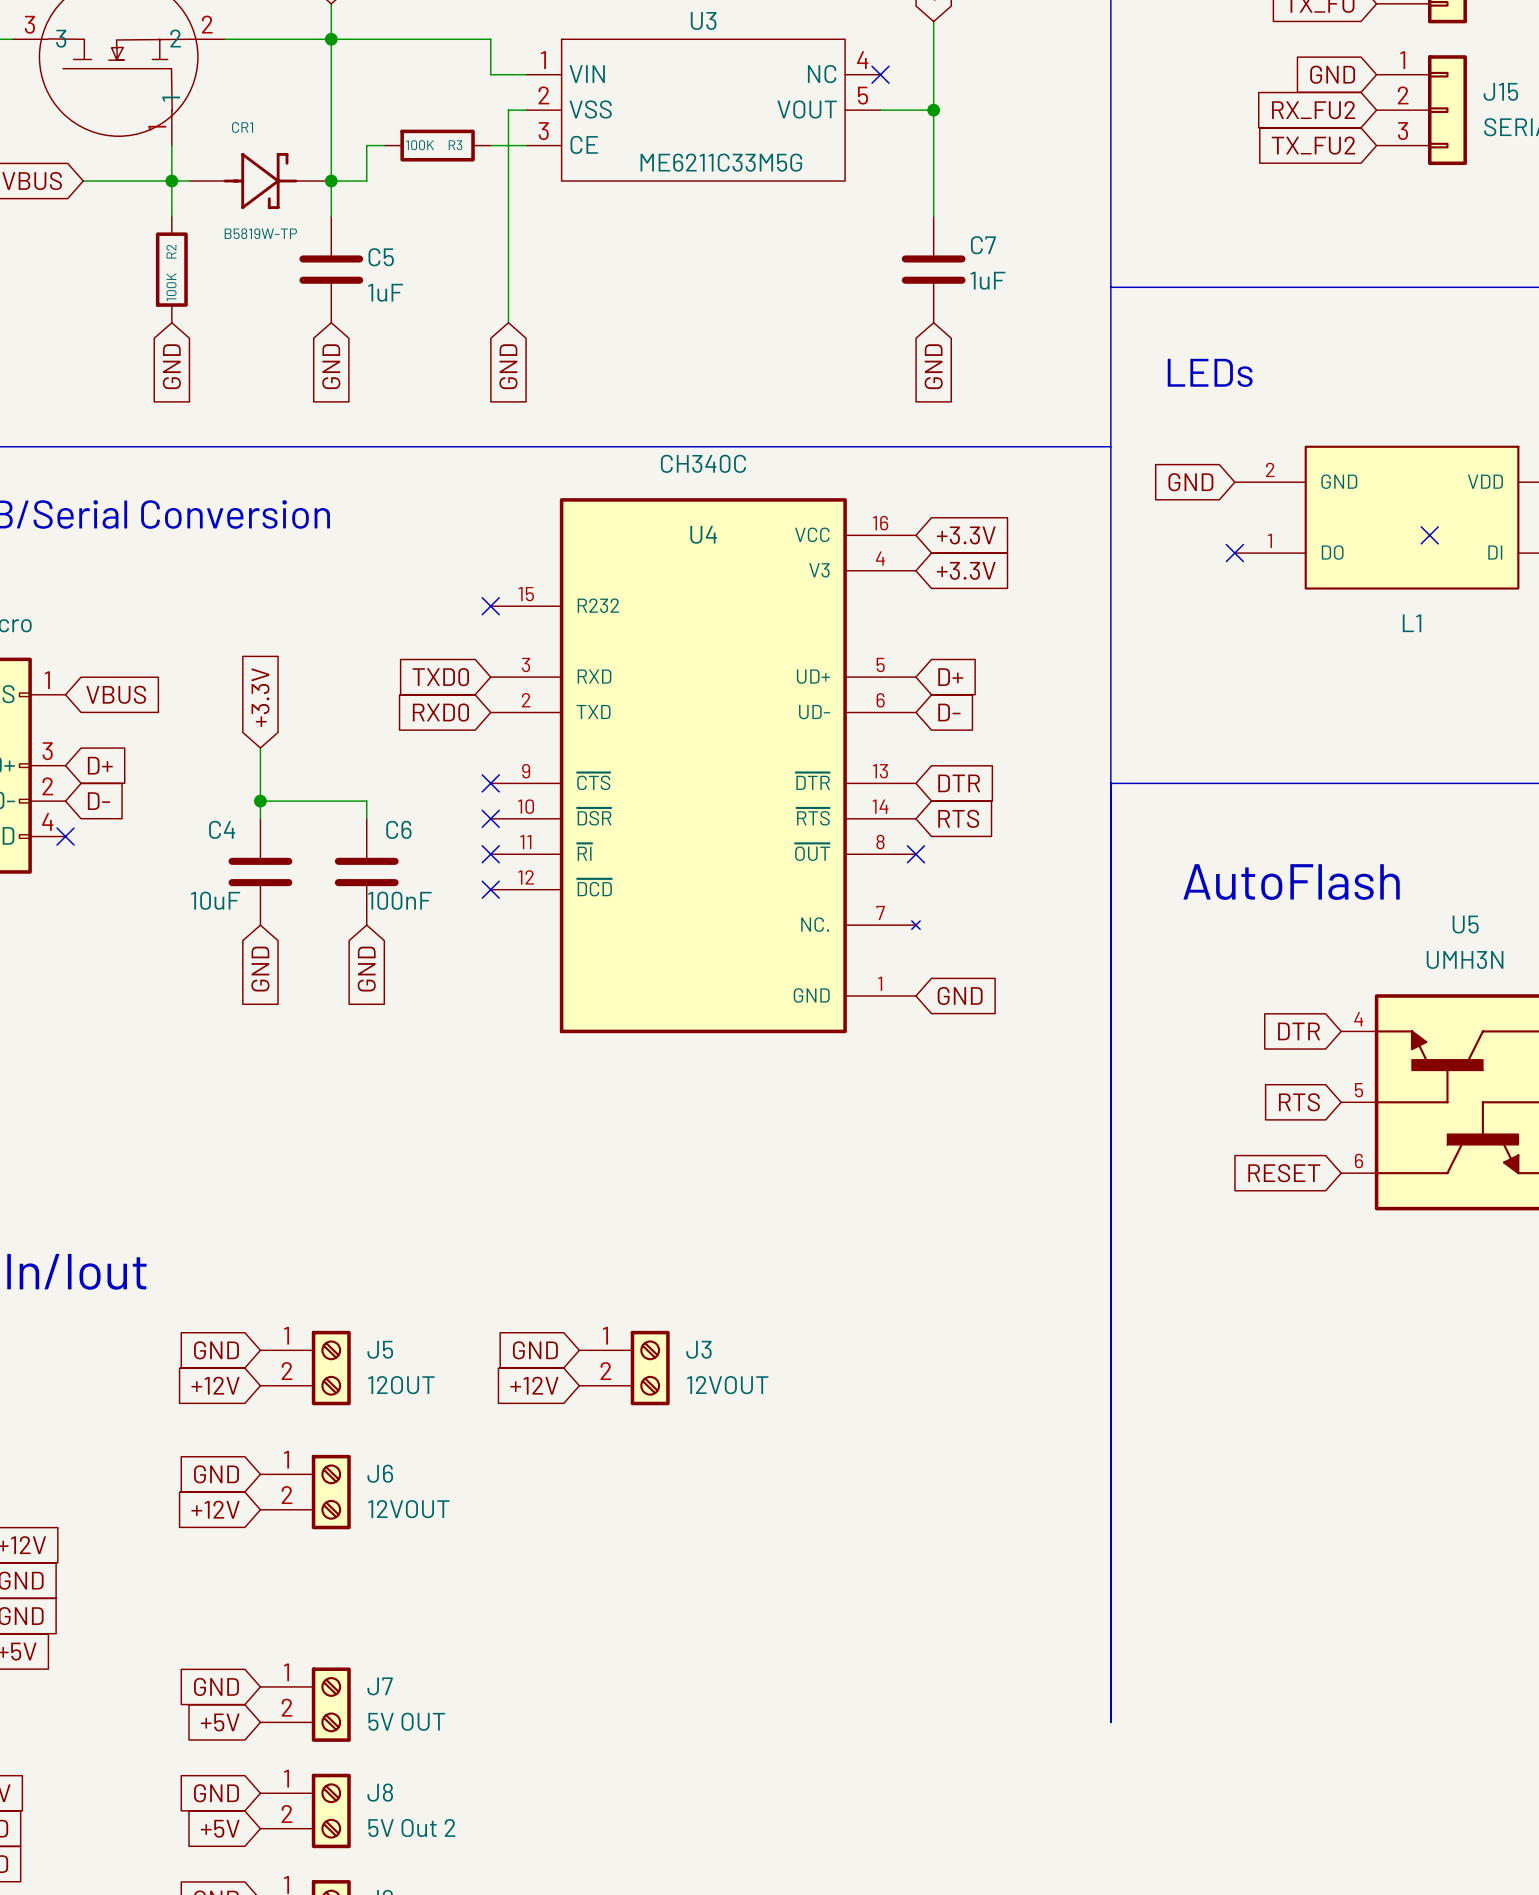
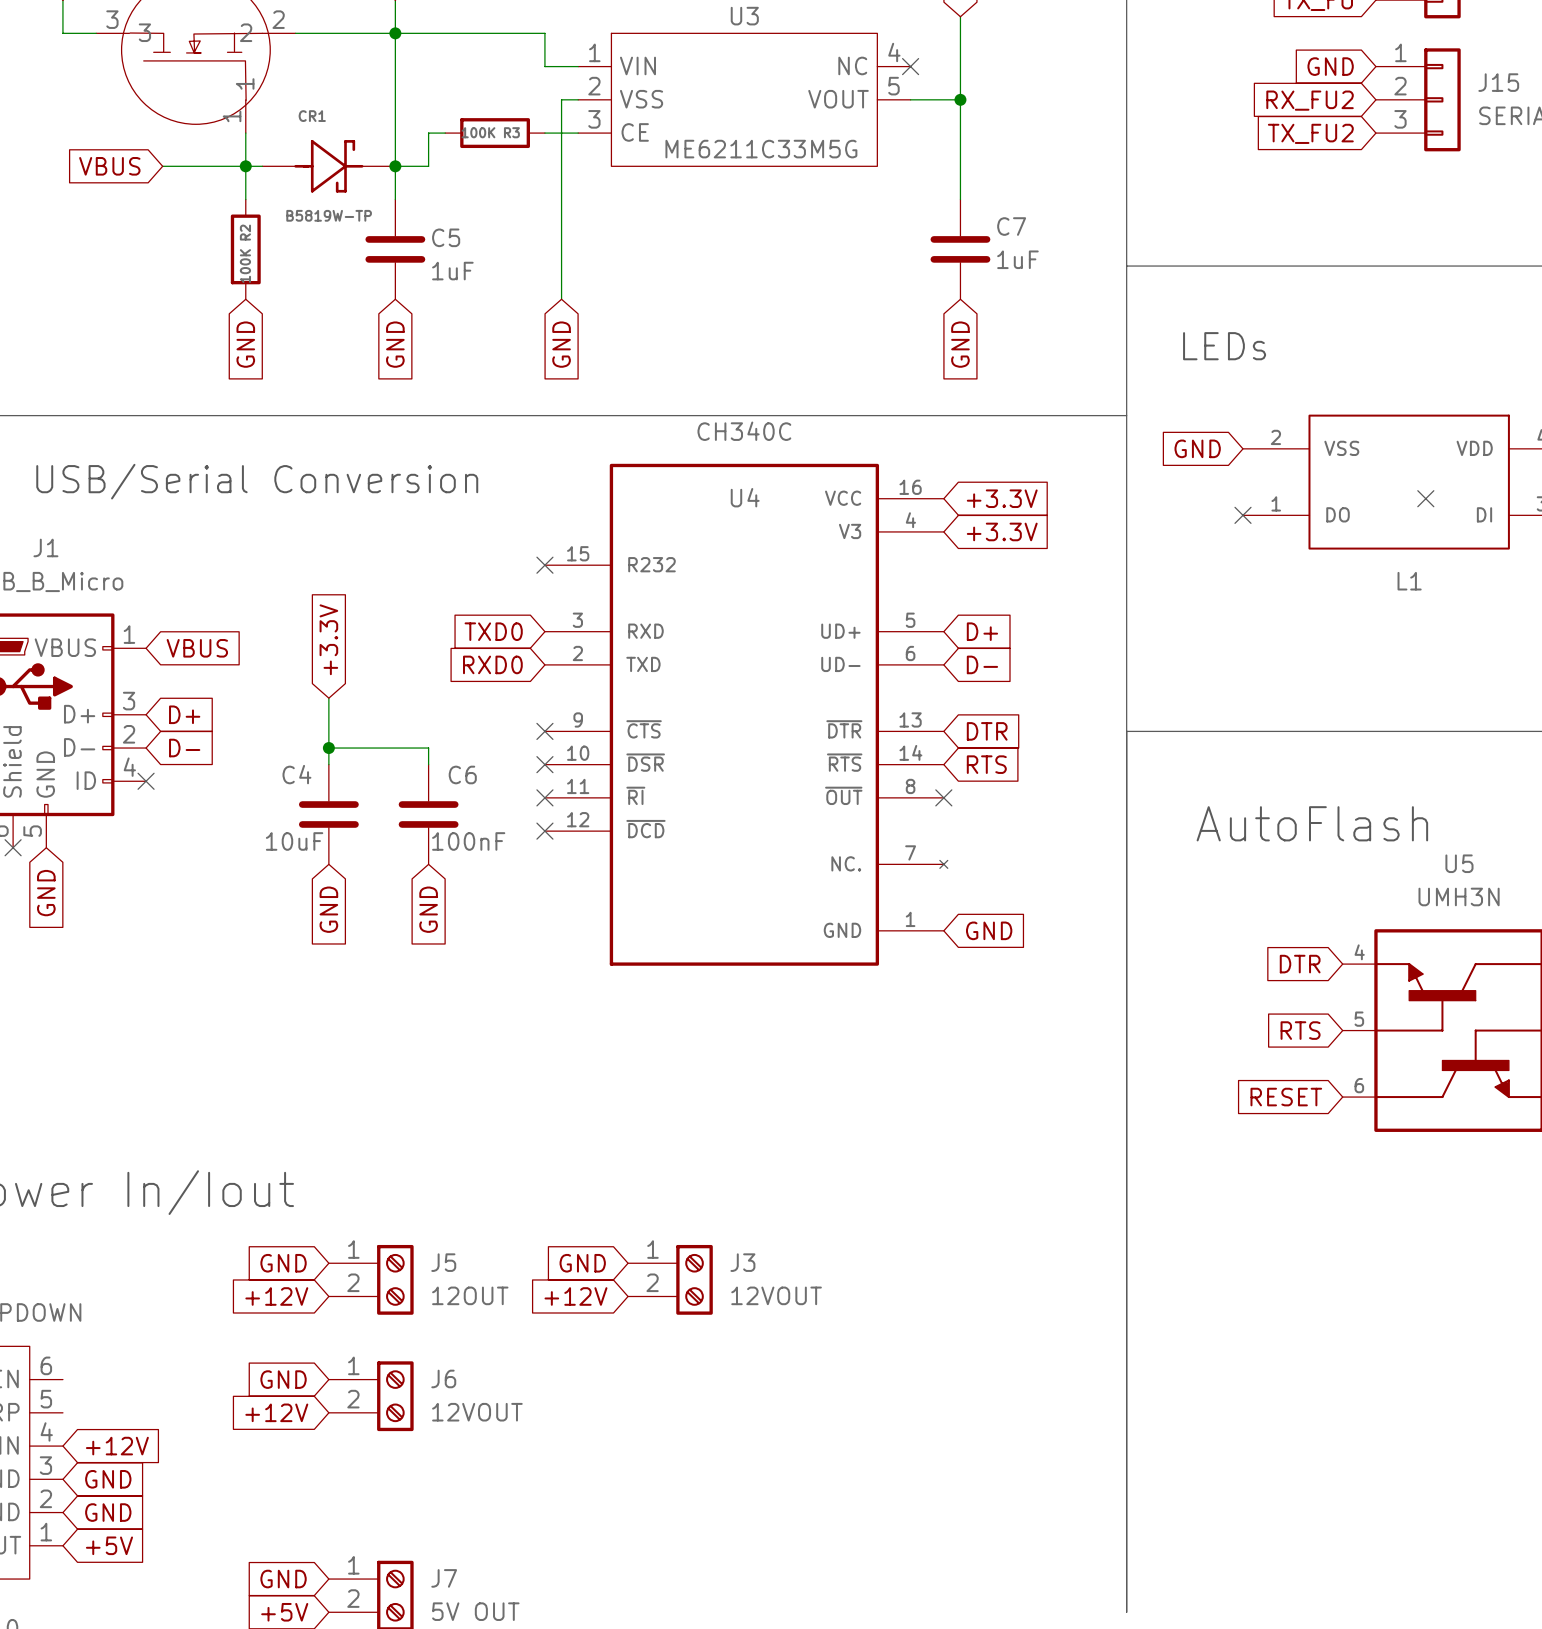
L1 pin name: GND (1339, 481) -> VSS (1341, 448)

